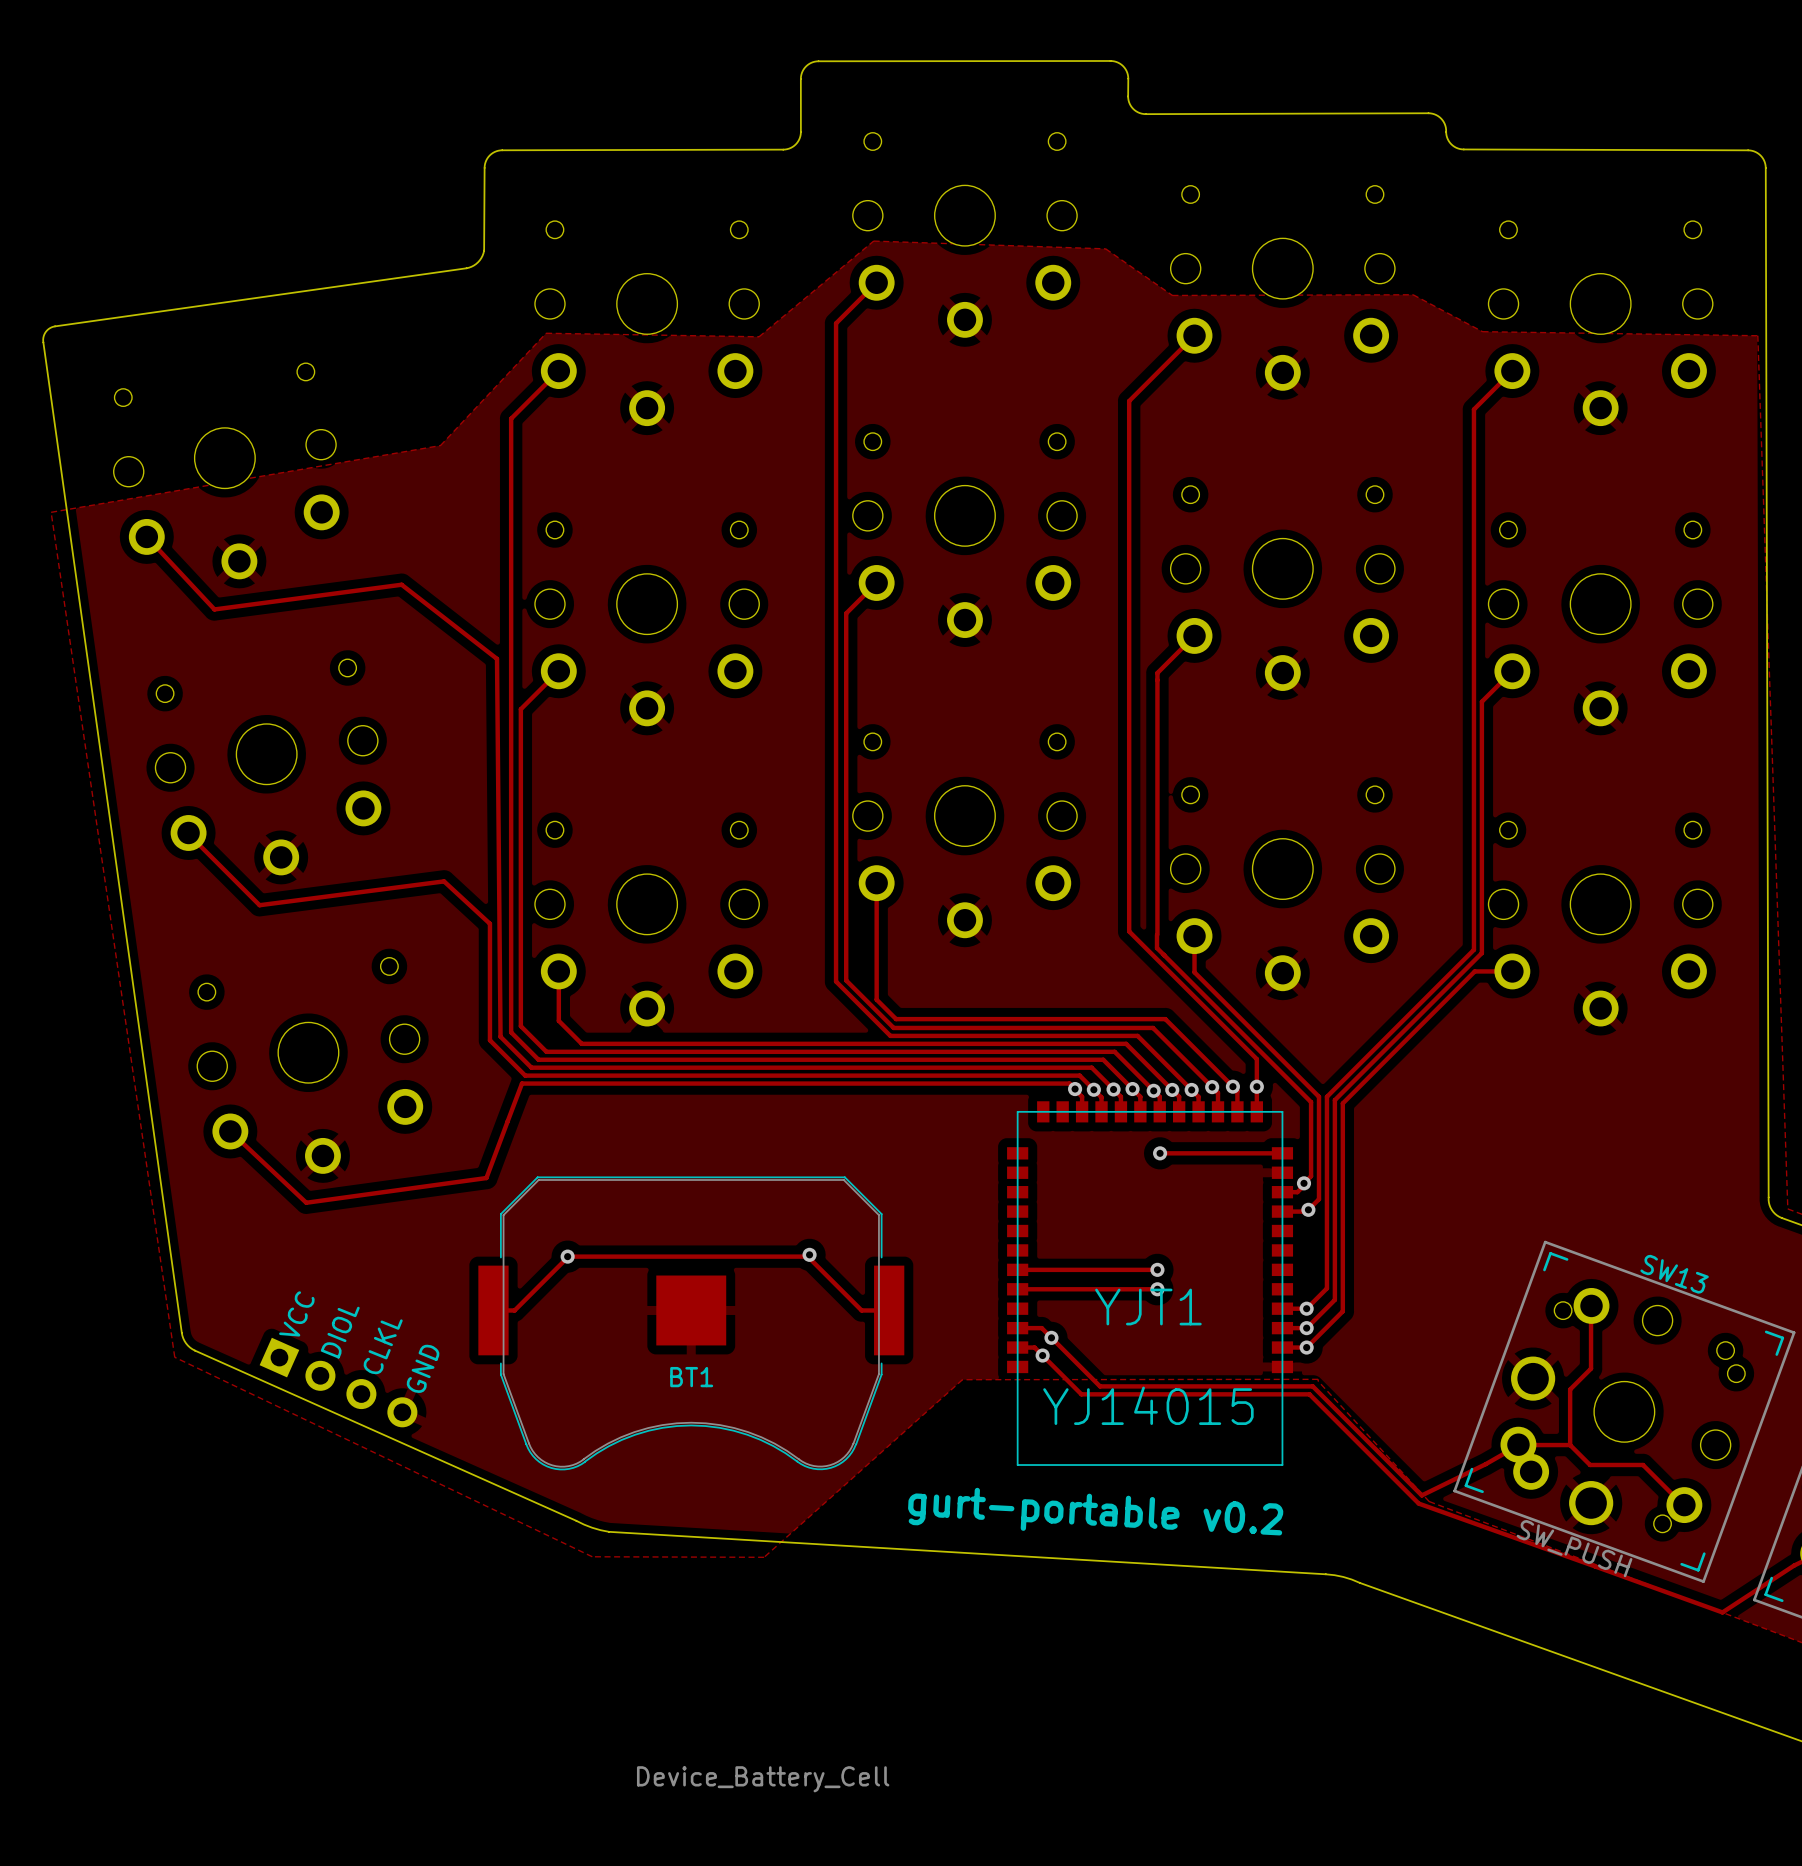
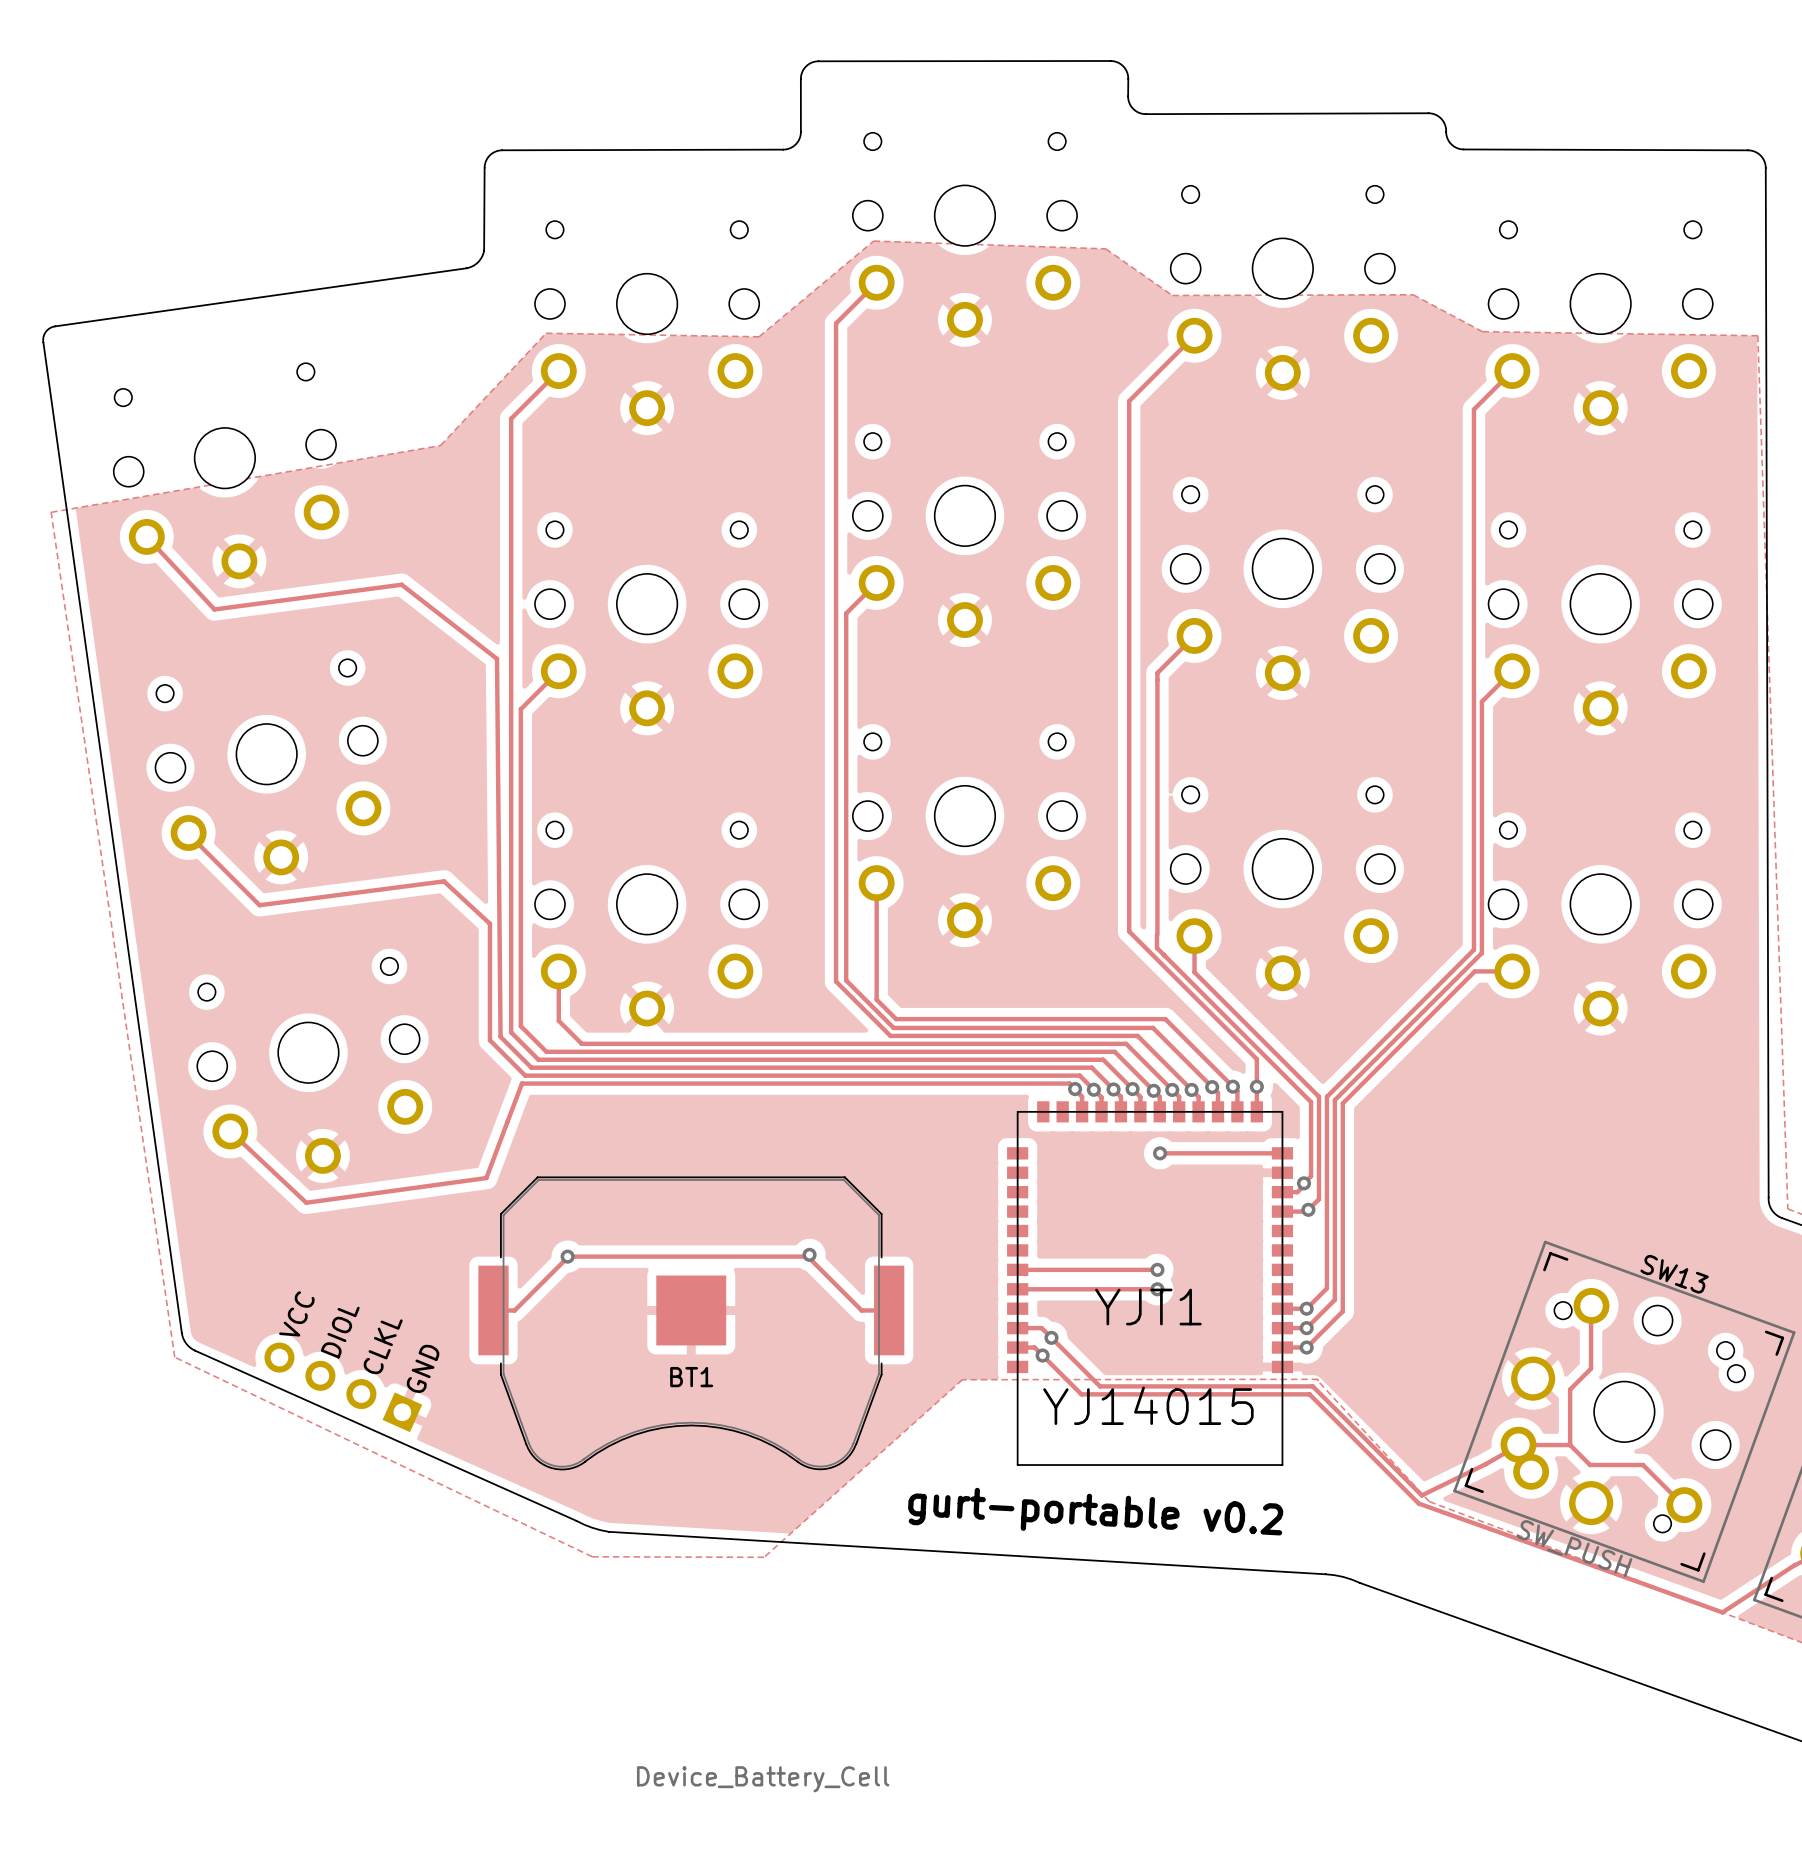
part rotation: 0° (338, 1382) -> 180° (343, 1387)

